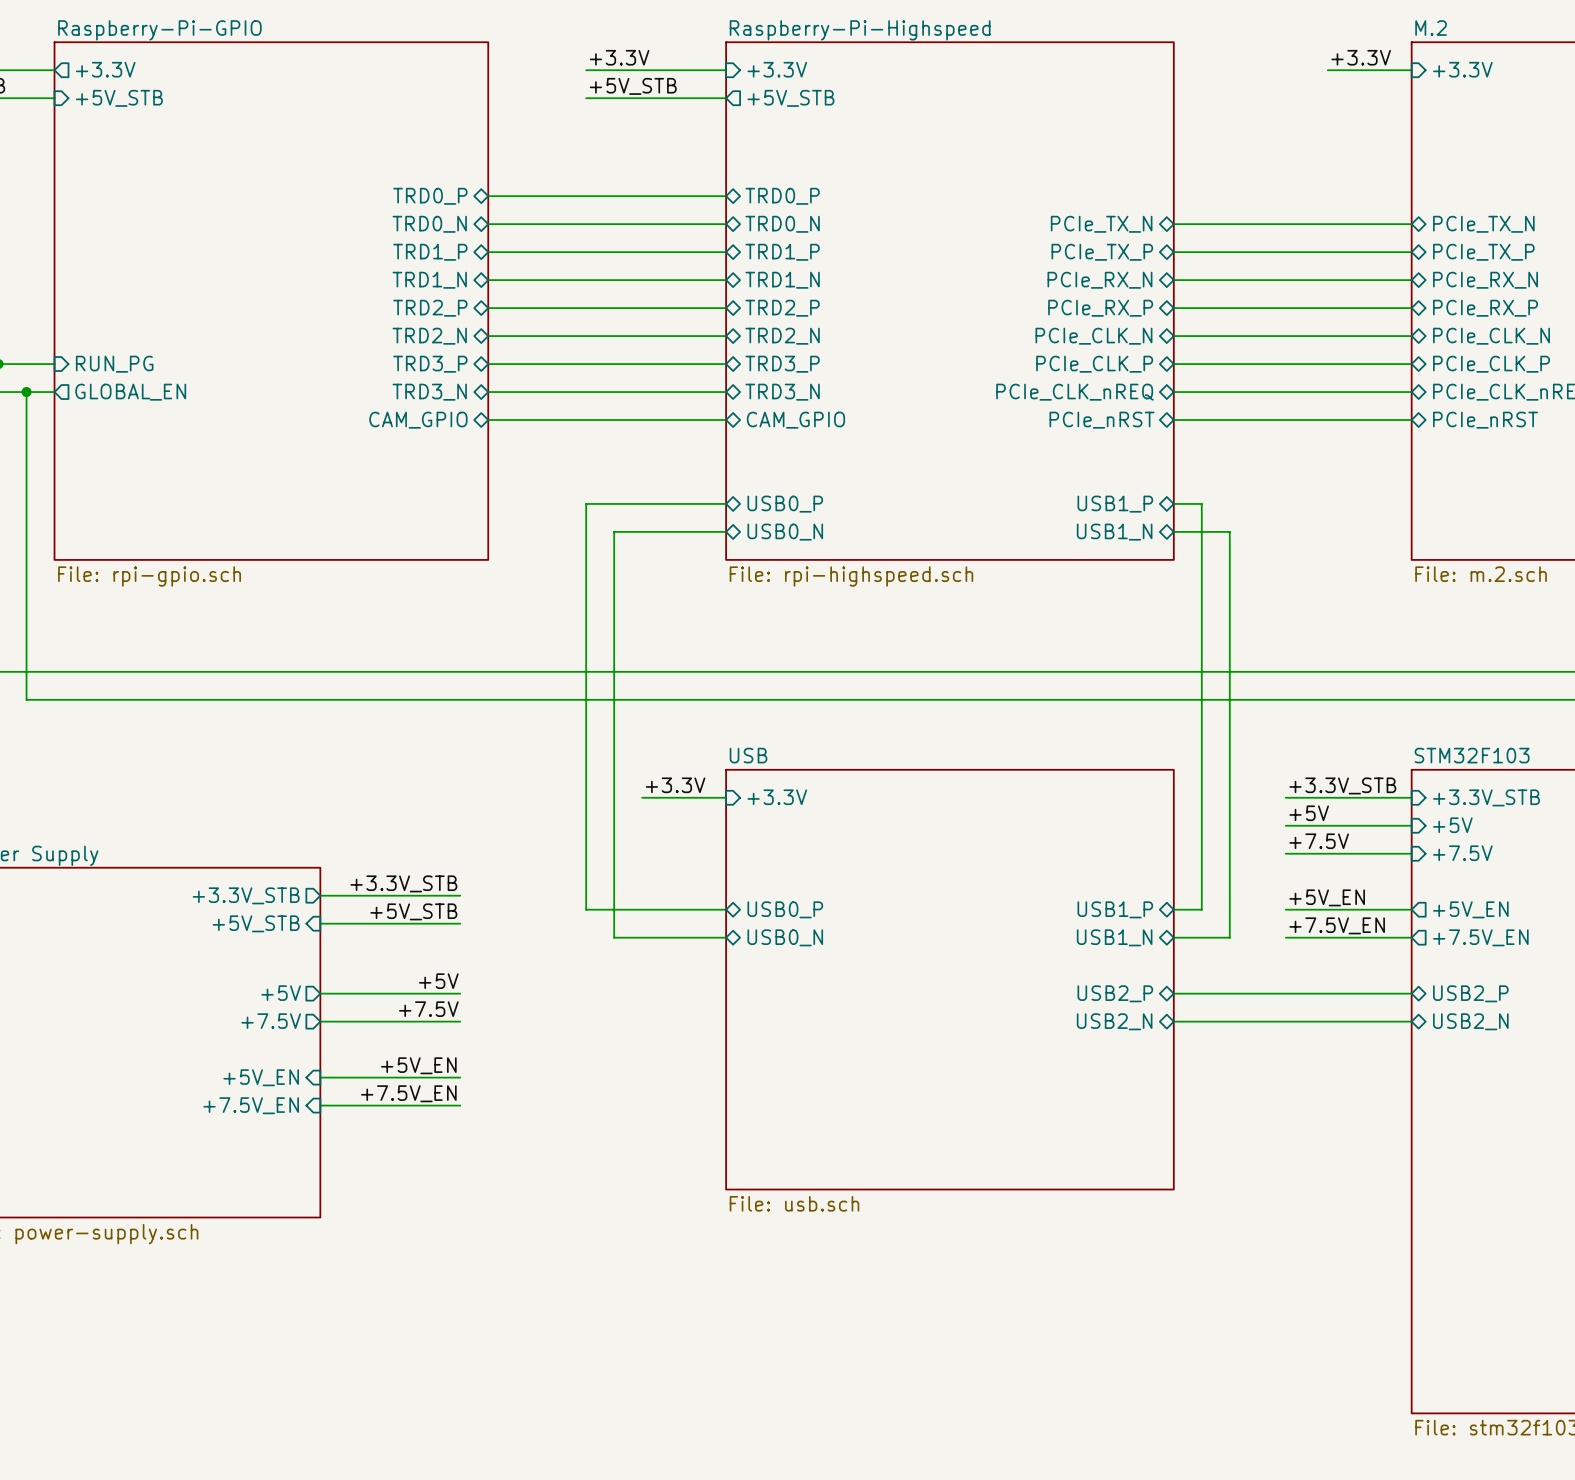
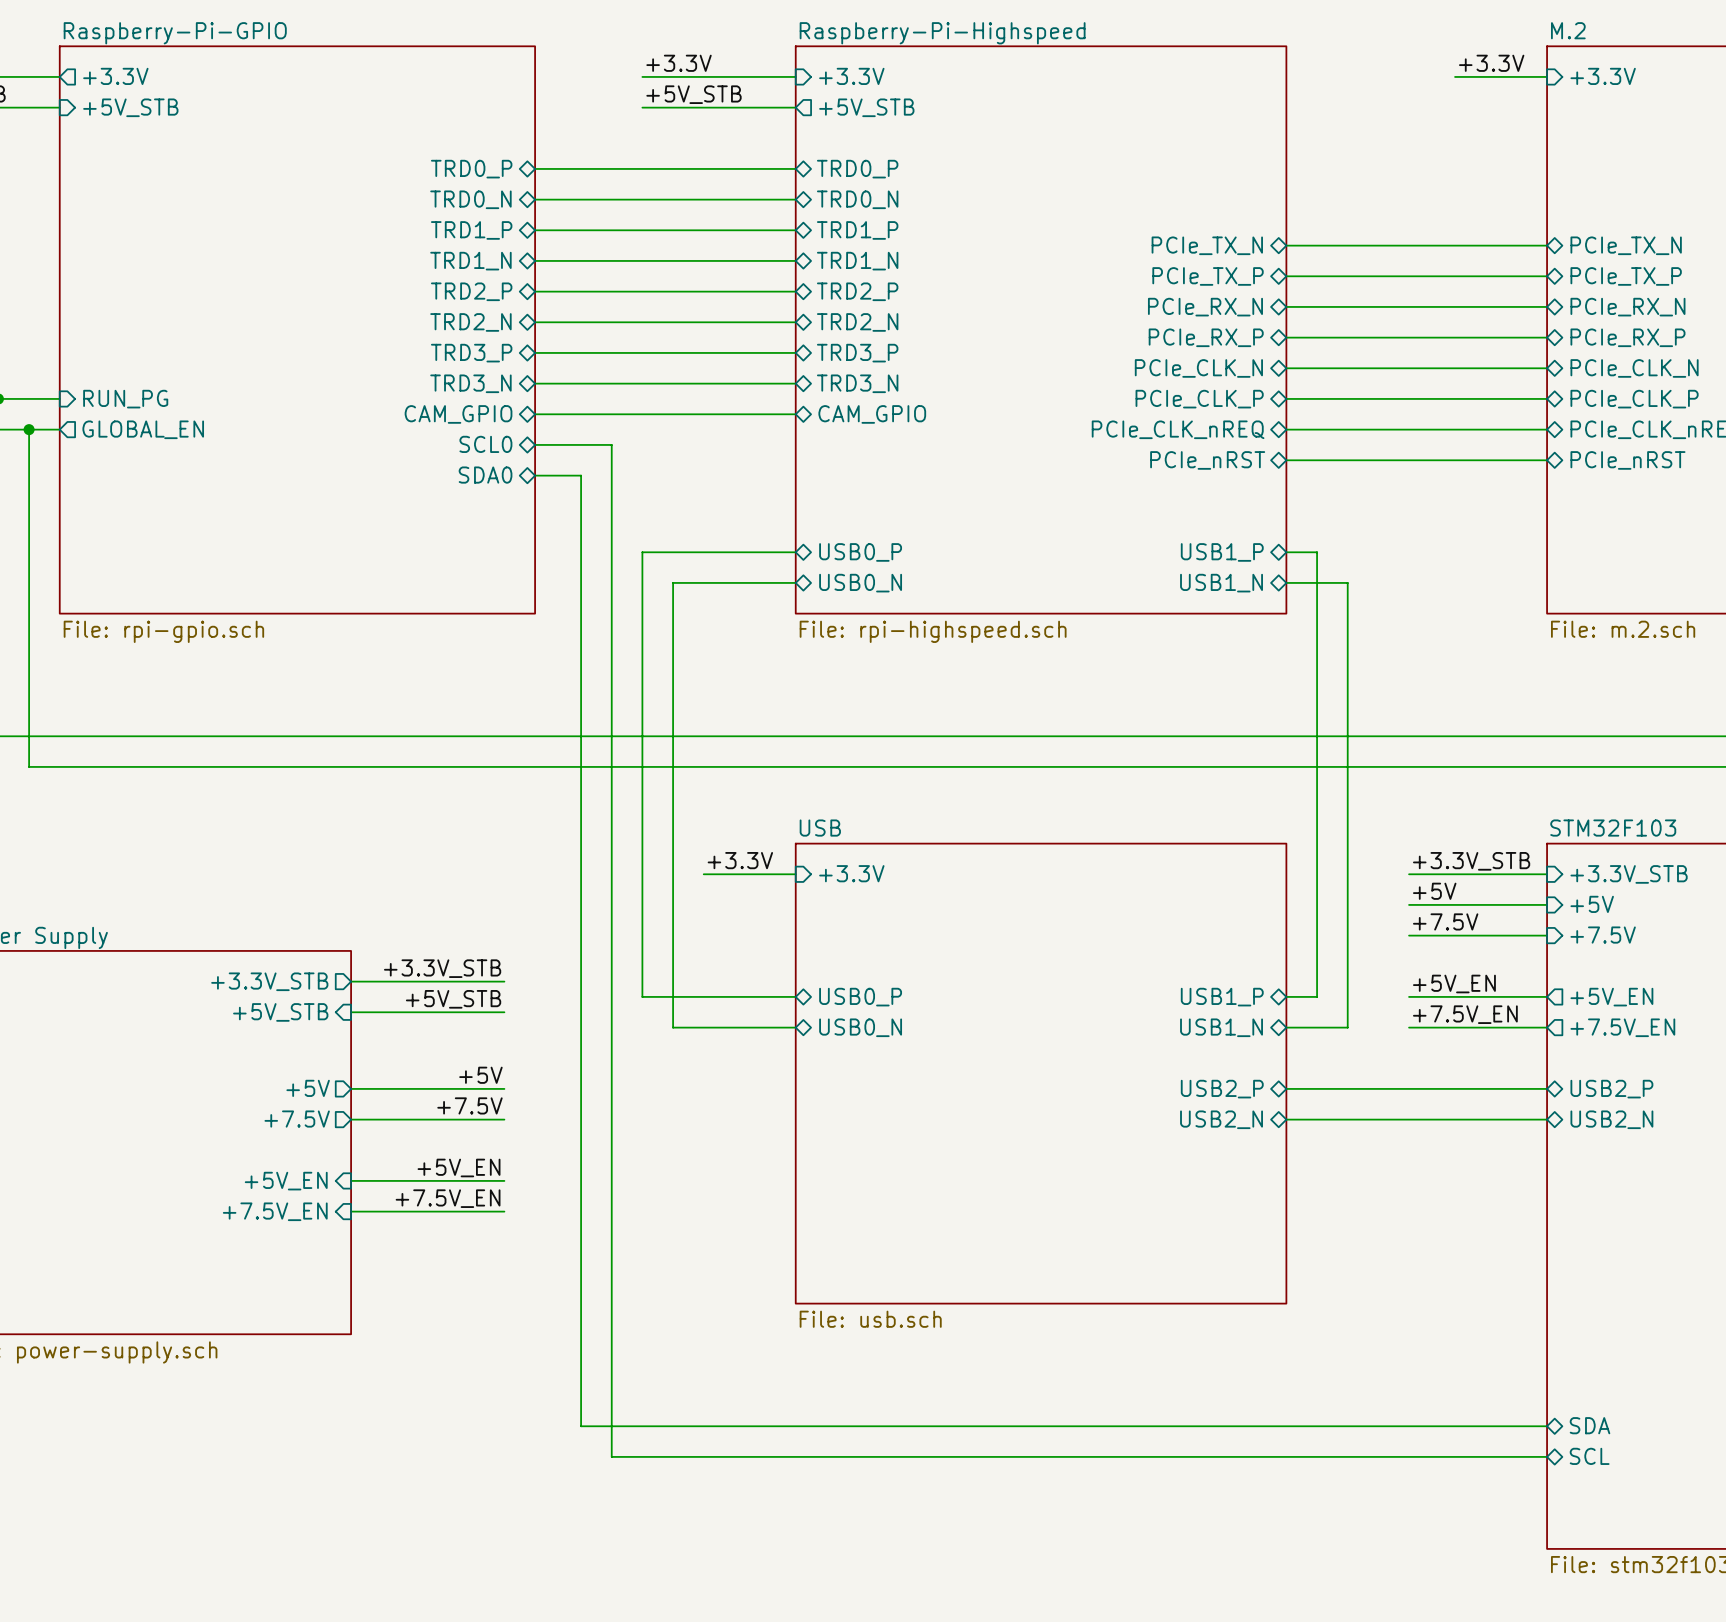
sheet pin position: TRD0_P (430, 196) -> TRD0_P (471, 169)
wire: (488, 196) (726, 196) -> (535, 168) (795, 168)
sheet pin position: TRD0_P (782, 196) -> TRD0_P (857, 169)
sheet pin position: TRD0_N (429, 224) -> TRD0_N (470, 199)
wire: (488, 224) (726, 224) -> (535, 199) (795, 199)
sheet pin position: TRD0_N (782, 224) -> TRD0_N (857, 199)
sheet pin position: TRD1_P (430, 252) -> TRD1_P (471, 230)
wire: (488, 252) (726, 252) -> (535, 230) (795, 230)
sheet pin position: TRD1_P (782, 252) -> TRD1_P (857, 230)
sheet pin position: TRD1_N (429, 280) -> TRD1_N (470, 261)
wire: (488, 280) (726, 280) -> (535, 260) (795, 260)
sheet pin position: TRD1_N (782, 280) -> TRD1_N (857, 261)
sheet pin position: TRD2_P (430, 308) -> TRD2_P (471, 291)
wire: (488, 308) (726, 308) -> (535, 291) (795, 291)
sheet pin position: TRD2_P (782, 308) -> TRD2_P (857, 291)
sheet pin position: TRD2_N (429, 336) -> TRD2_N (470, 322)
wire: (488, 336) (726, 336) -> (535, 322) (795, 322)
sheet pin position: TRD2_N (782, 336) -> TRD2_N (857, 322)
sheet pin position: TRD3_P (430, 364) -> TRD3_P (471, 353)
wire: (488, 364) (726, 364) -> (535, 352) (795, 352)
sheet pin position: TRD3_P (782, 364) -> TRD3_P (857, 353)
sheet pin position: TRD3_N (429, 392) -> TRD3_N (470, 383)
wire: (488, 392) (726, 392) -> (535, 383) (795, 383)
sheet pin position: TRD3_N (782, 392) -> TRD3_N (857, 383)
sheet pin: none -> SCL0 (485, 444)
wire: none -> (535, 444) (611, 444) (611, 1456) (1547, 1456)
sheet pin position: CAM_GPIO (418, 420) -> CAM_GPIO (458, 414)
wire: (488, 420) (726, 420) -> (535, 414) (795, 414)
sheet pin position: CAM_GPIO (795, 420) -> CAM_GPIO (872, 414)
sheet pin: none -> SDA0 (485, 475)
wire: none -> (535, 475) (581, 475) (581, 1426) (1547, 1426)
sheet pin: none -> SDA (1590, 1425)
sheet pin: none -> SCL (1589, 1456)

